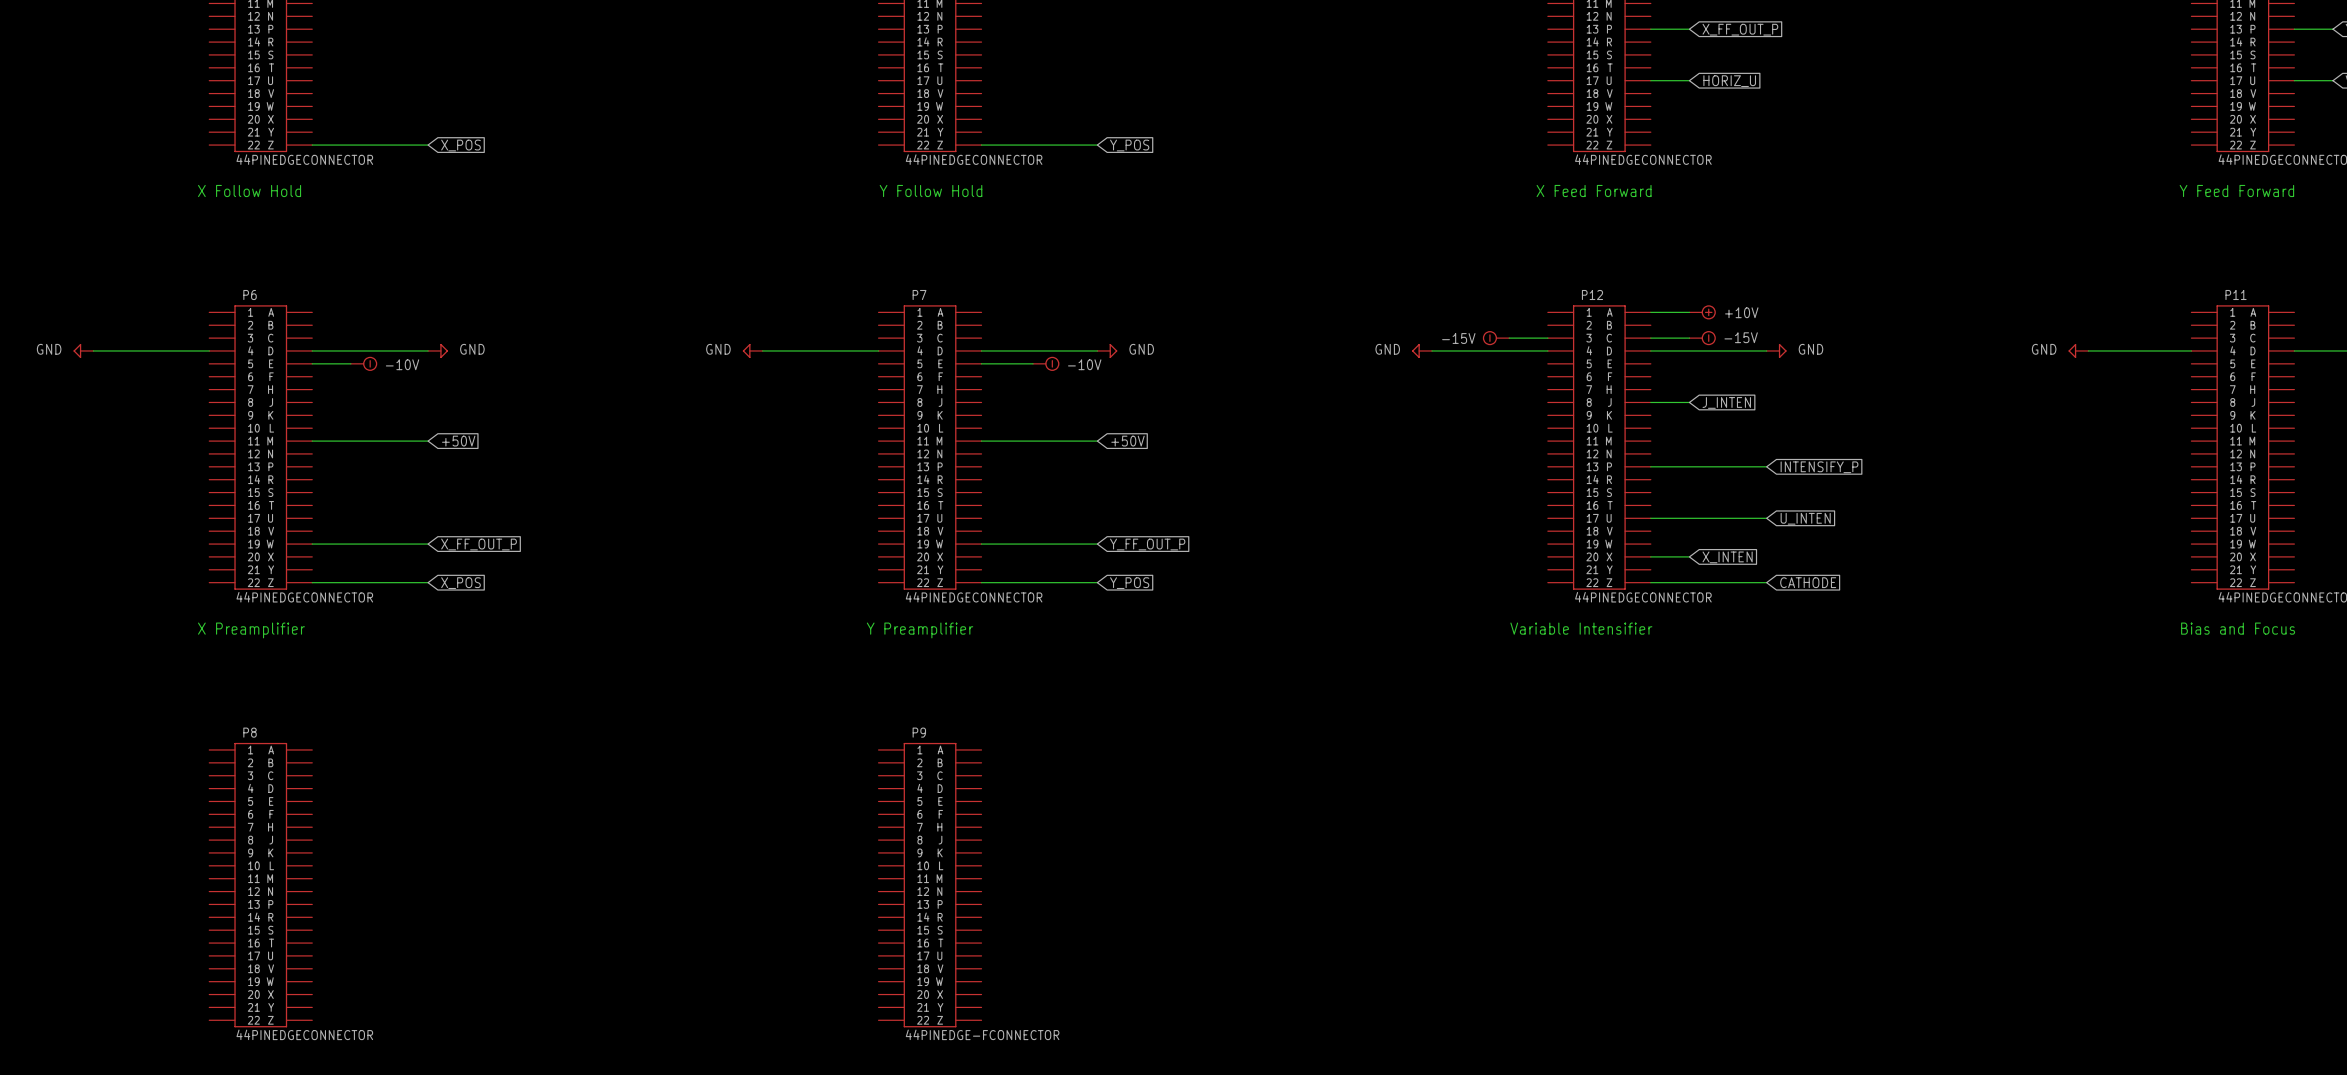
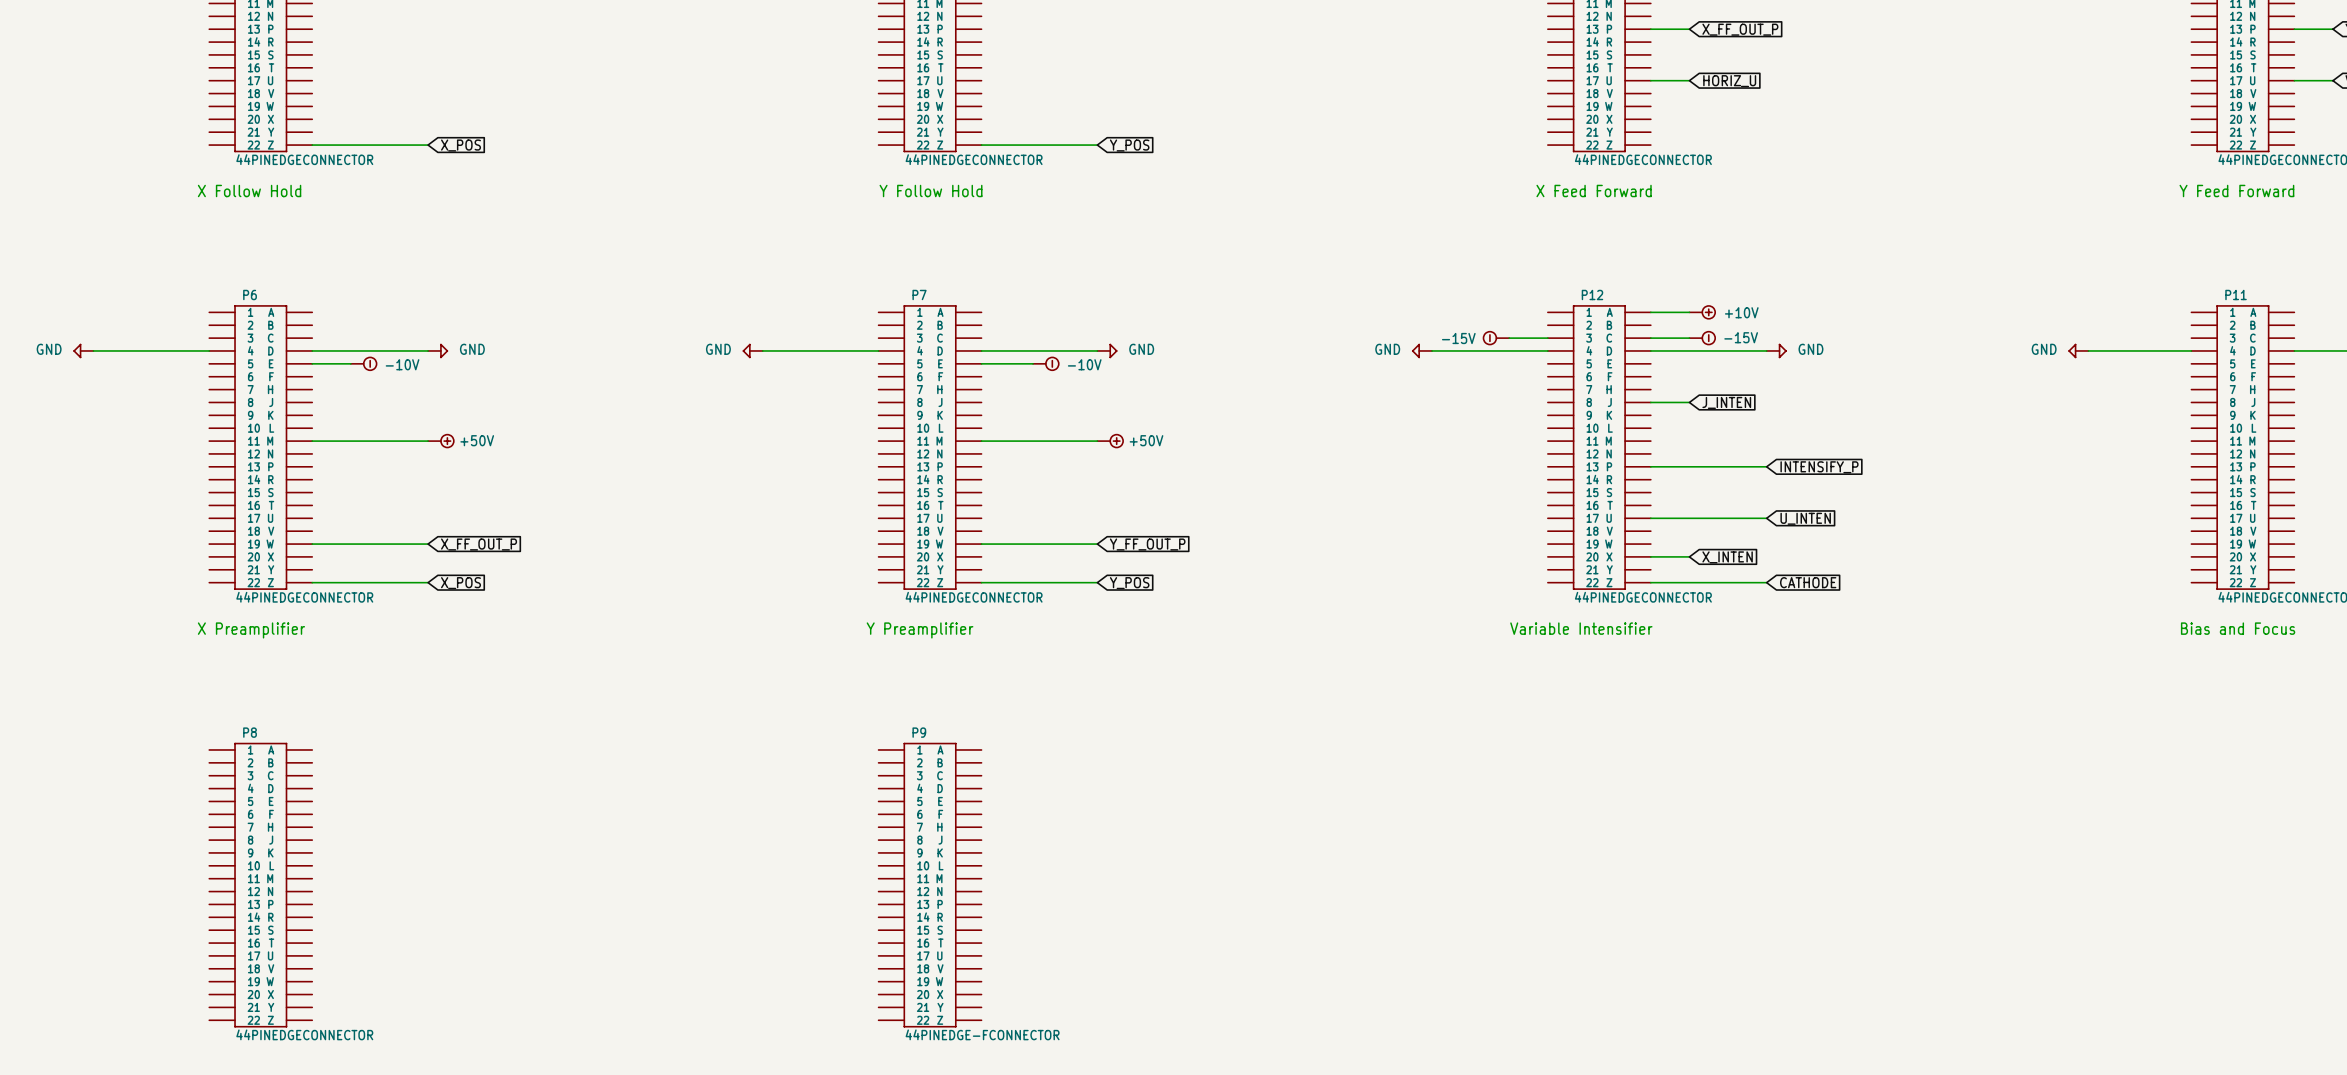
power symbol: none -> +50V (441, 441)
global label: +50V (458, 441) -> none
power symbol: none -> +50V (1110, 441)
global label: +50V (1127, 441) -> none

